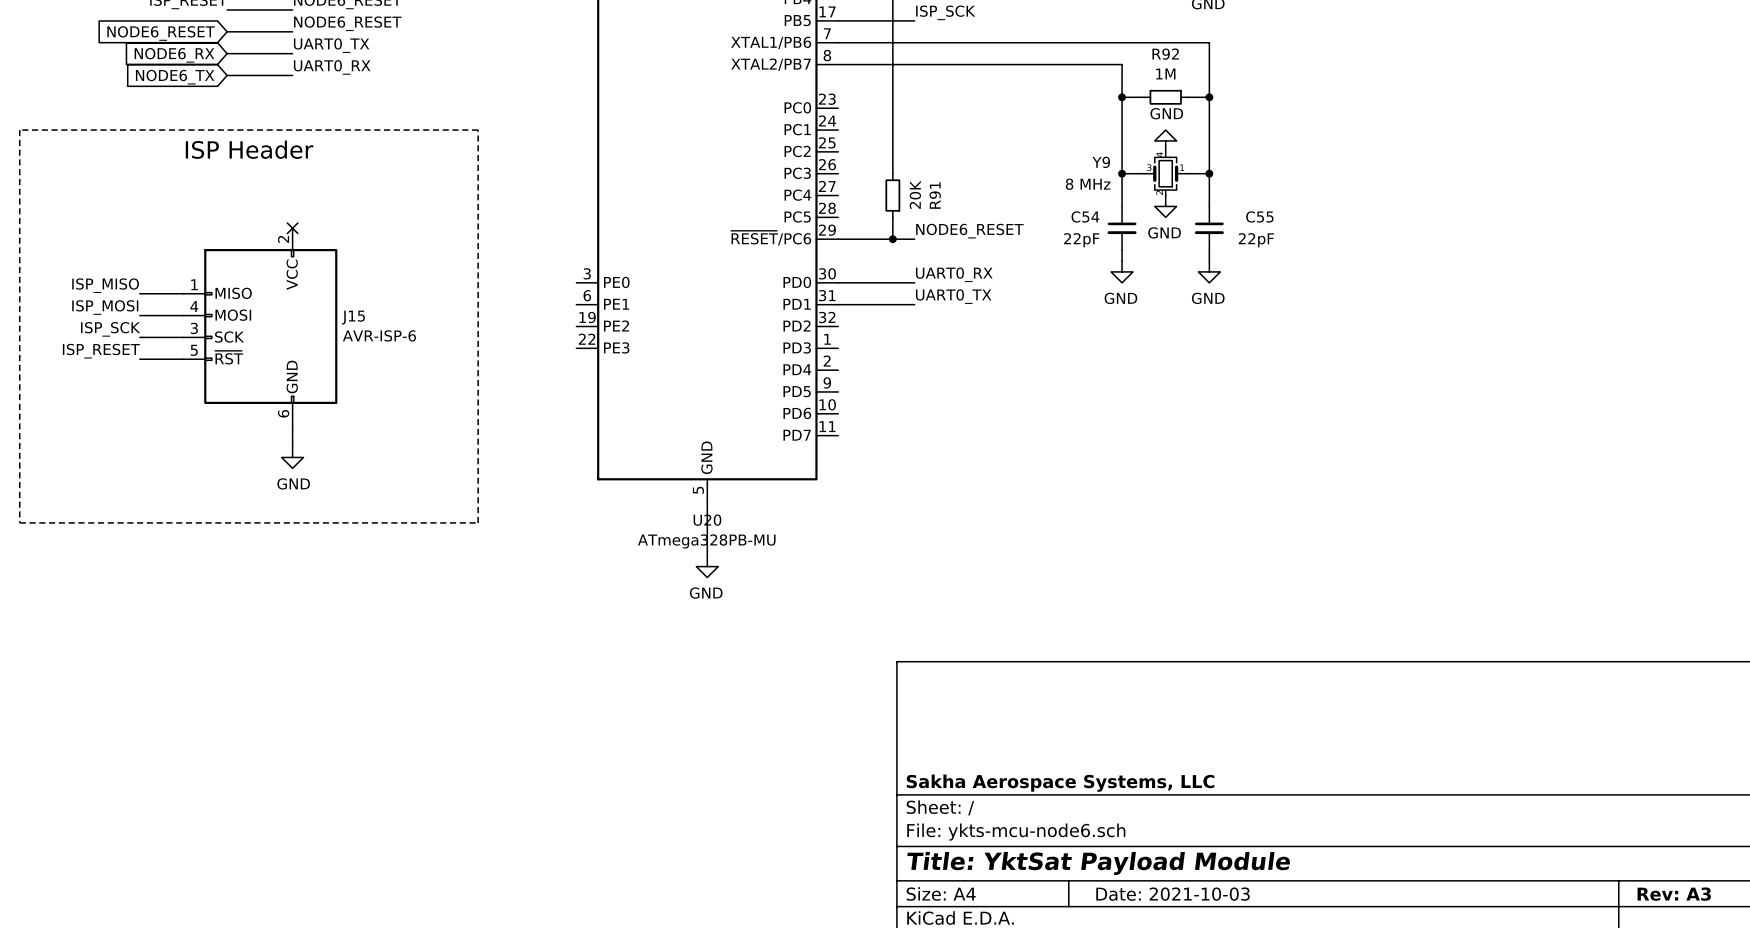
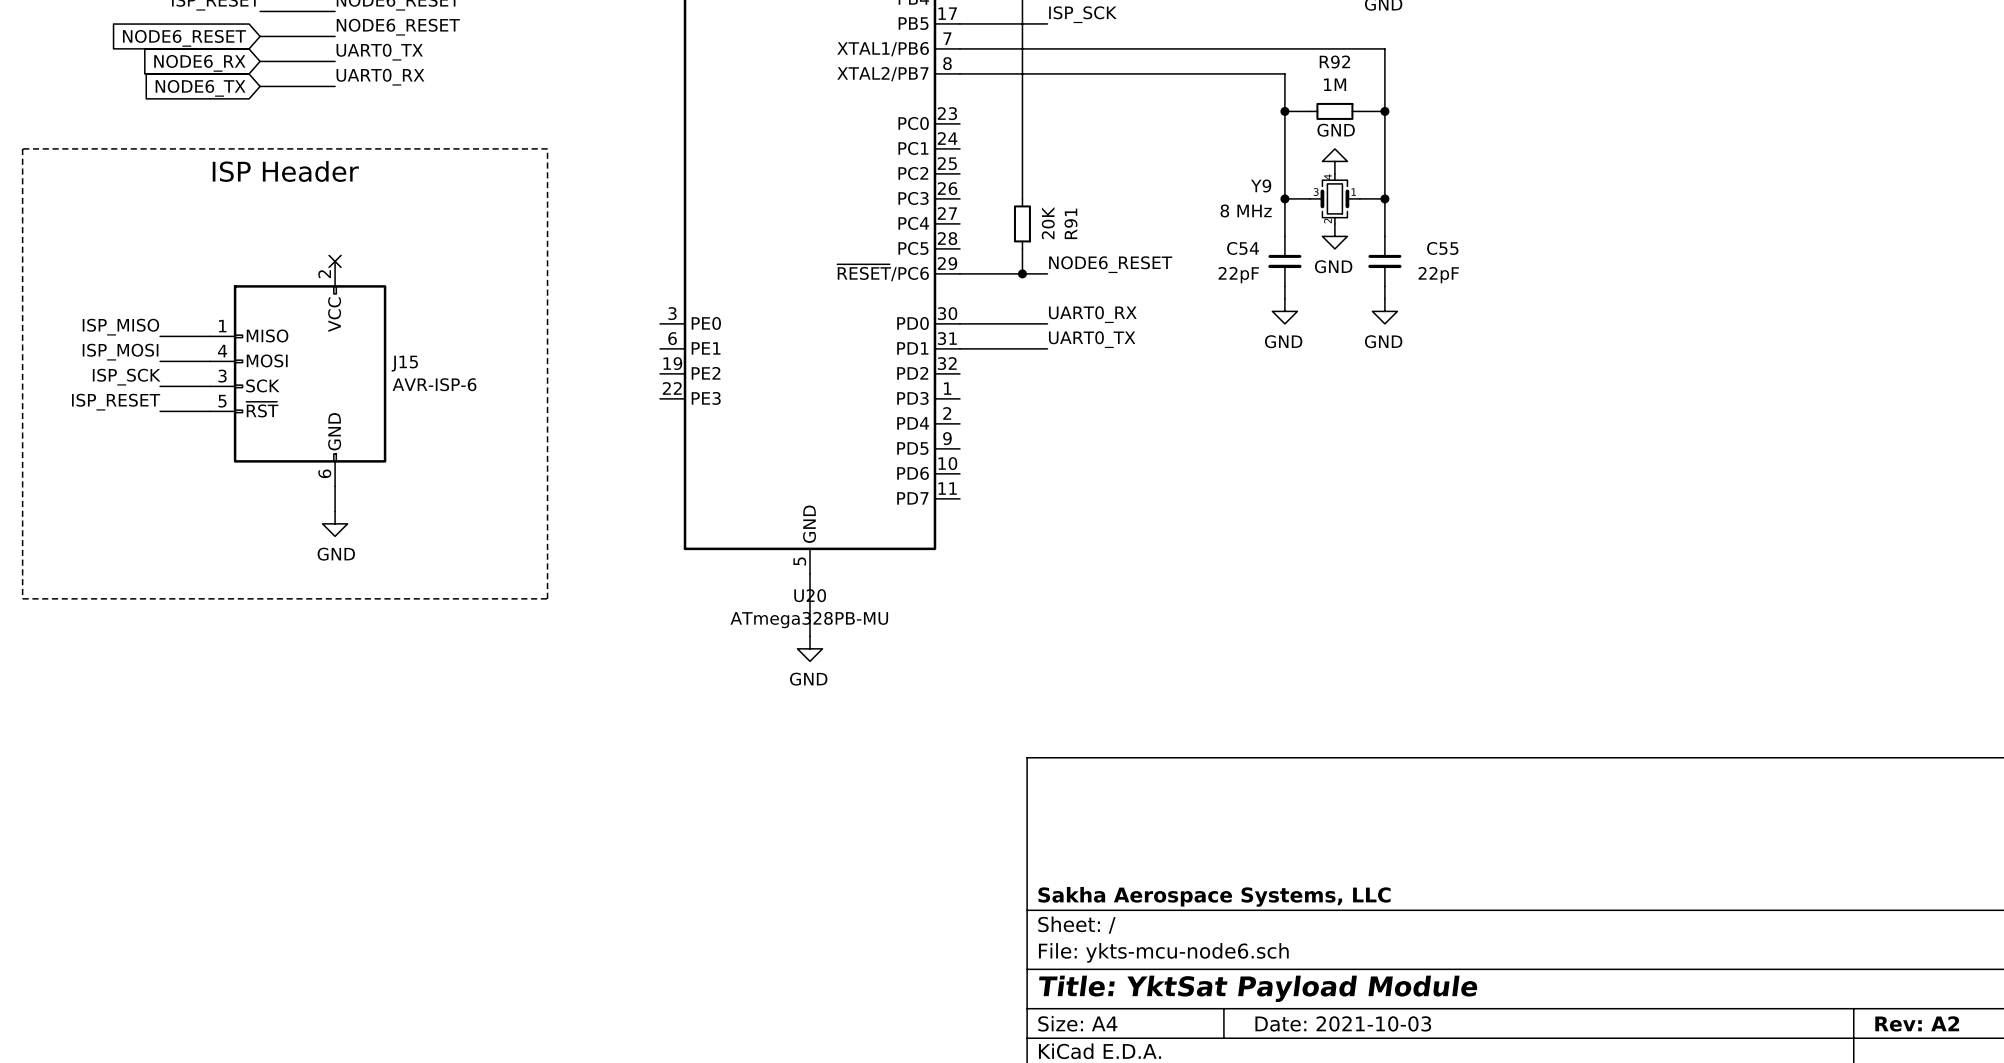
title block: Rev: A3 (1674, 894) -> Rev: A2 (1917, 1023)

